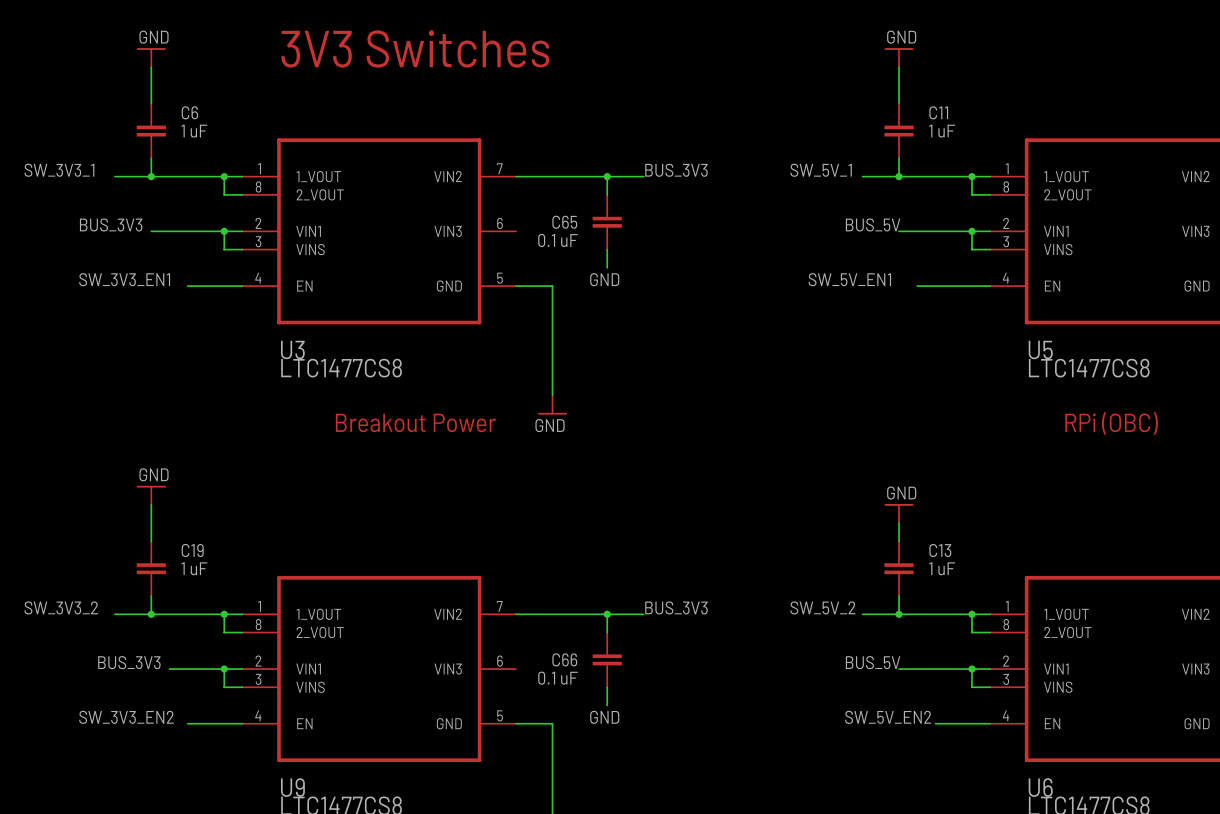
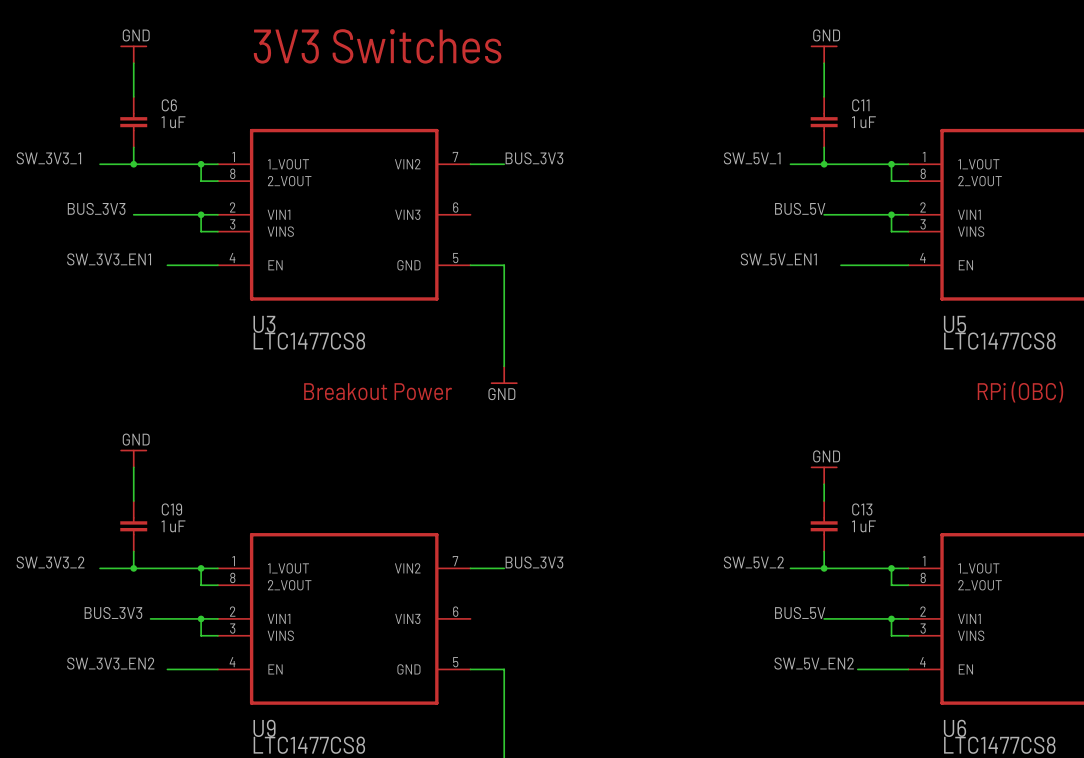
label position: BUS_3V3 (676, 170) -> BUS_3V3 (534, 158)
wire: (552, 176) (643, 176) -> none
wire: (607, 176) (607, 194) -> none
junction: (607, 176) -> none
C65: 0.1 uF (607, 222) -> none
wire: (607, 249) (607, 267) -> none
label: GND (604, 279) -> none
label position: BUS_3V3 (676, 607) -> BUS_3V3 (534, 562)
wire: (552, 614) (643, 614) -> none
wire: (607, 614) (607, 632) -> none
junction: (607, 614) -> none
C66: 0.1 uF (607, 659) -> none
wire: (607, 687) (607, 705) -> none
label: GND (604, 717) -> none

